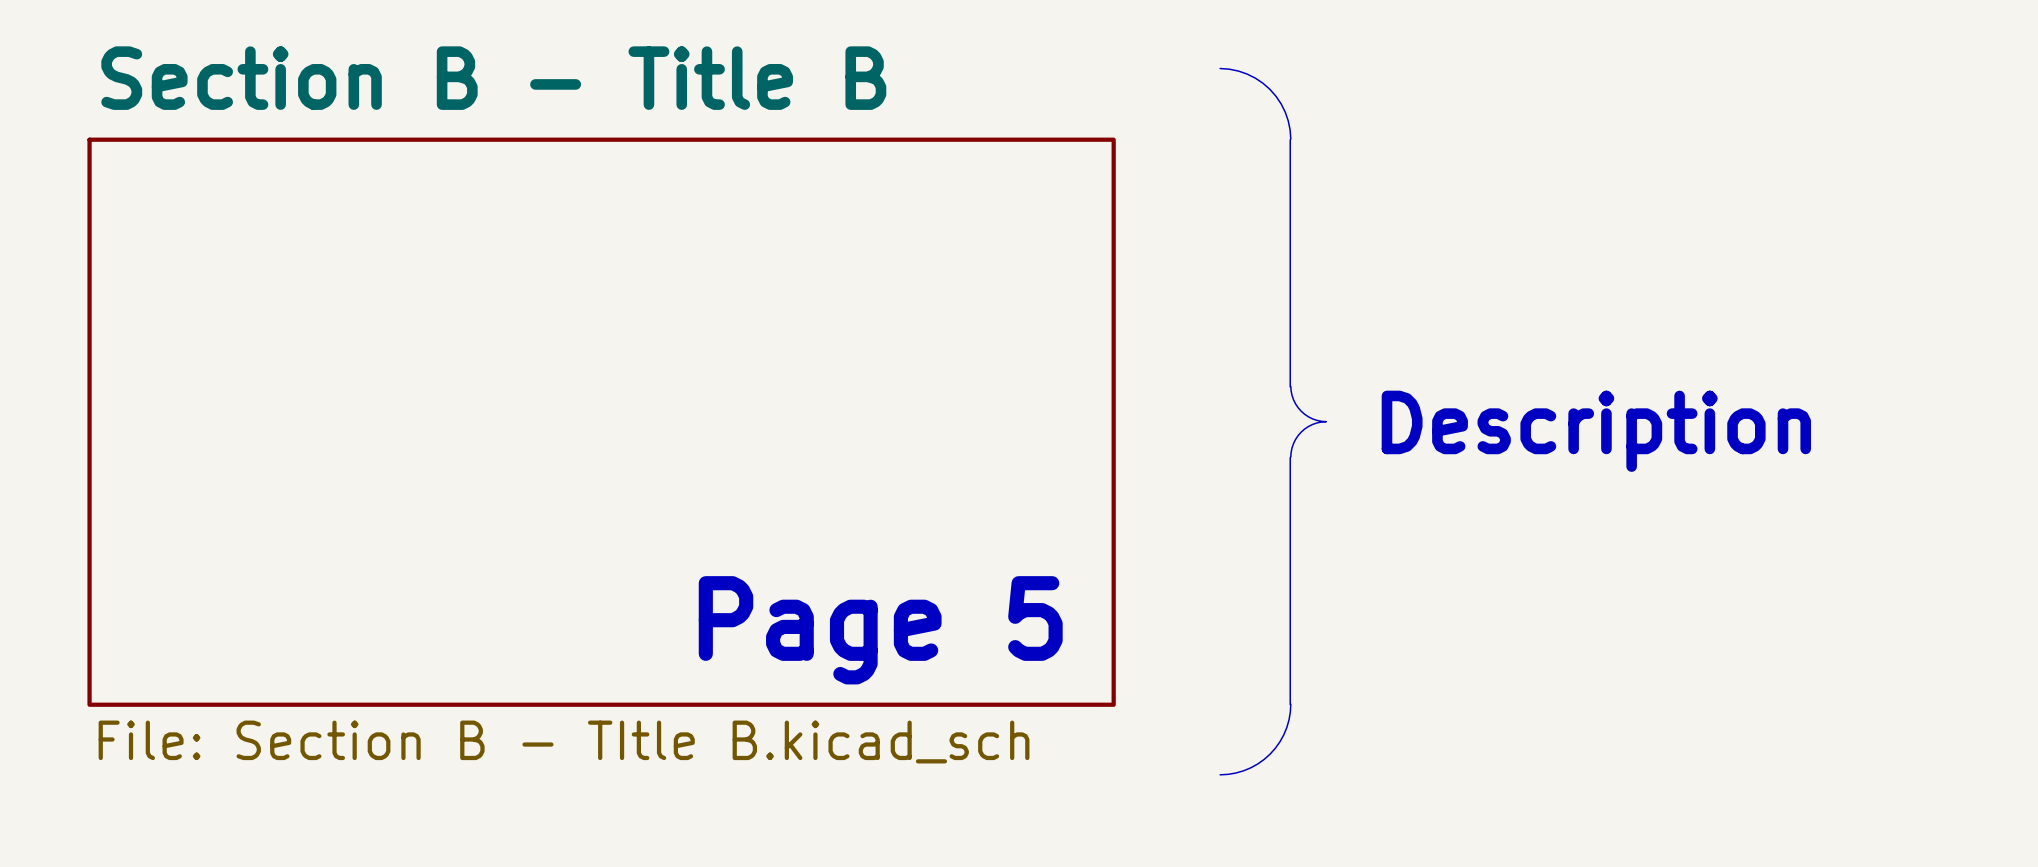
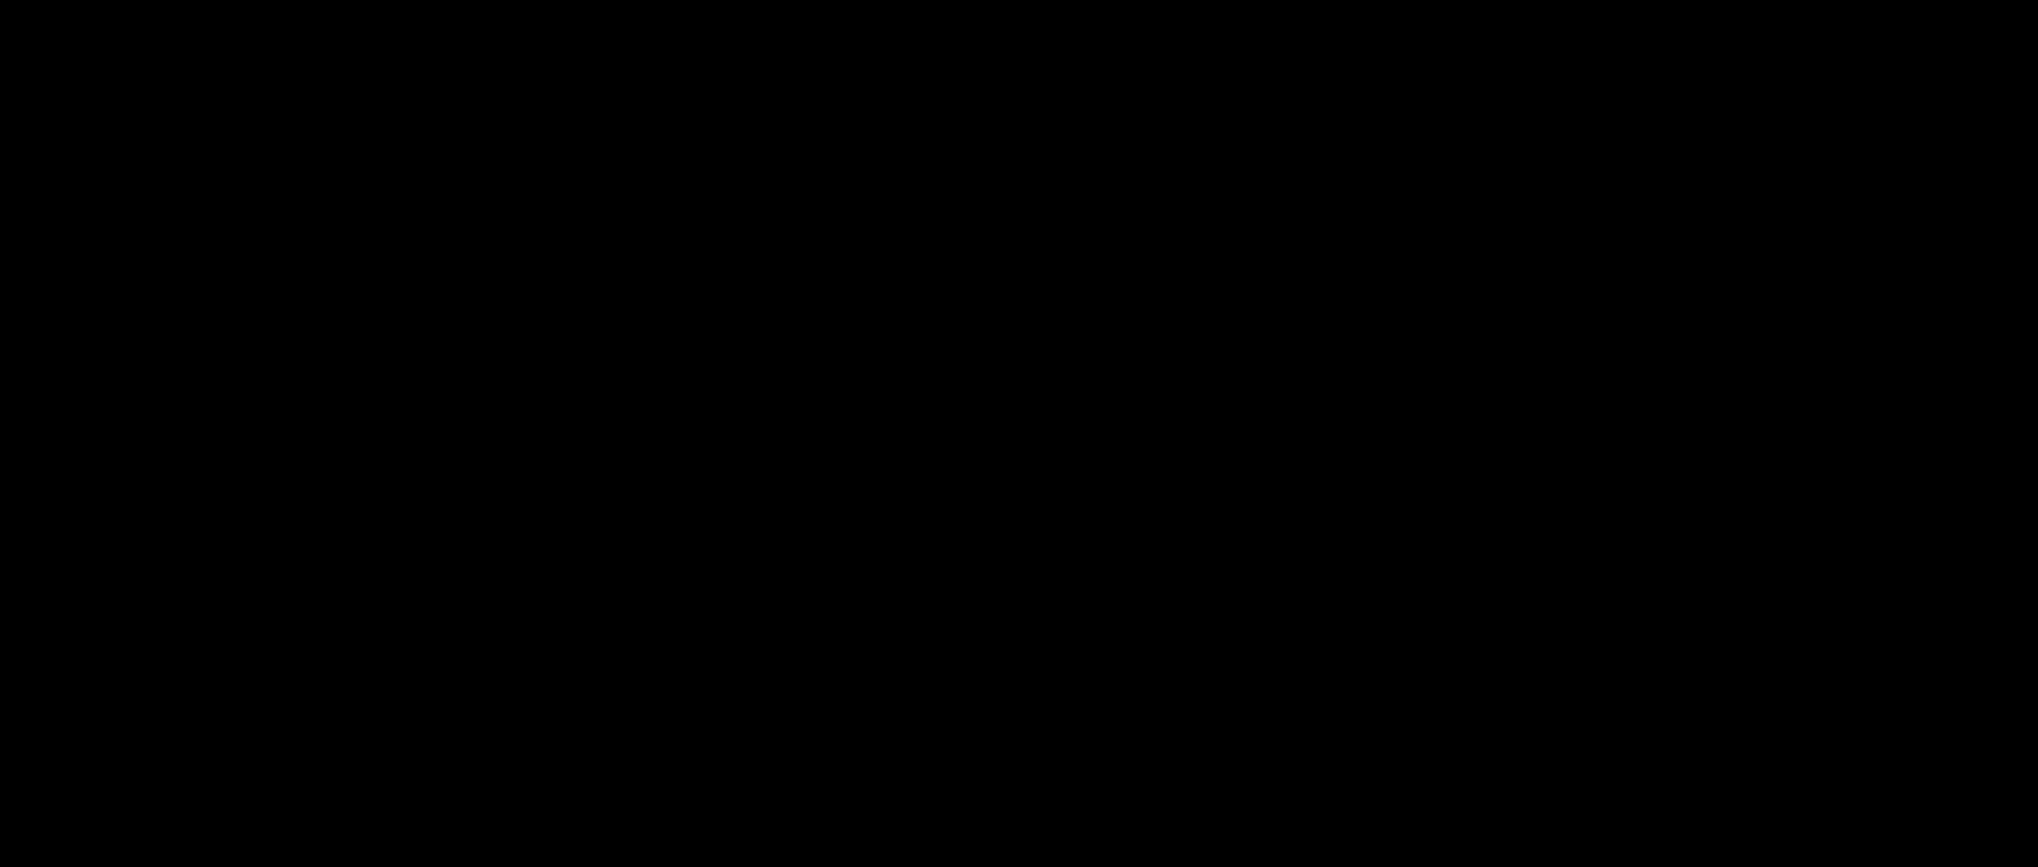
line: (1220, 68) (1247, 74) (1269, 89) (1285, 112) (1290, 139) -> none
line: (1290, 139) (1290, 386) -> none
line: (1290, 386) (1293, 399) (1301, 411) (1312, 418) (1326, 421) (1312, 424) (1301, 432) (1293, 443) (1290, 456) -> none
sheet Section B - Title B: File: Section B - TItle B.kicad_sch (601, 422) -> none
text: Description (1596, 431) -> none
line: (1290, 457) (1290, 704) -> none
text: Page 5 (880, 630) -> none
line: (1290, 704) (1286, 727) (1279, 741) (1270, 754) (1257, 763) (1243, 770) (1220, 774) -> none

